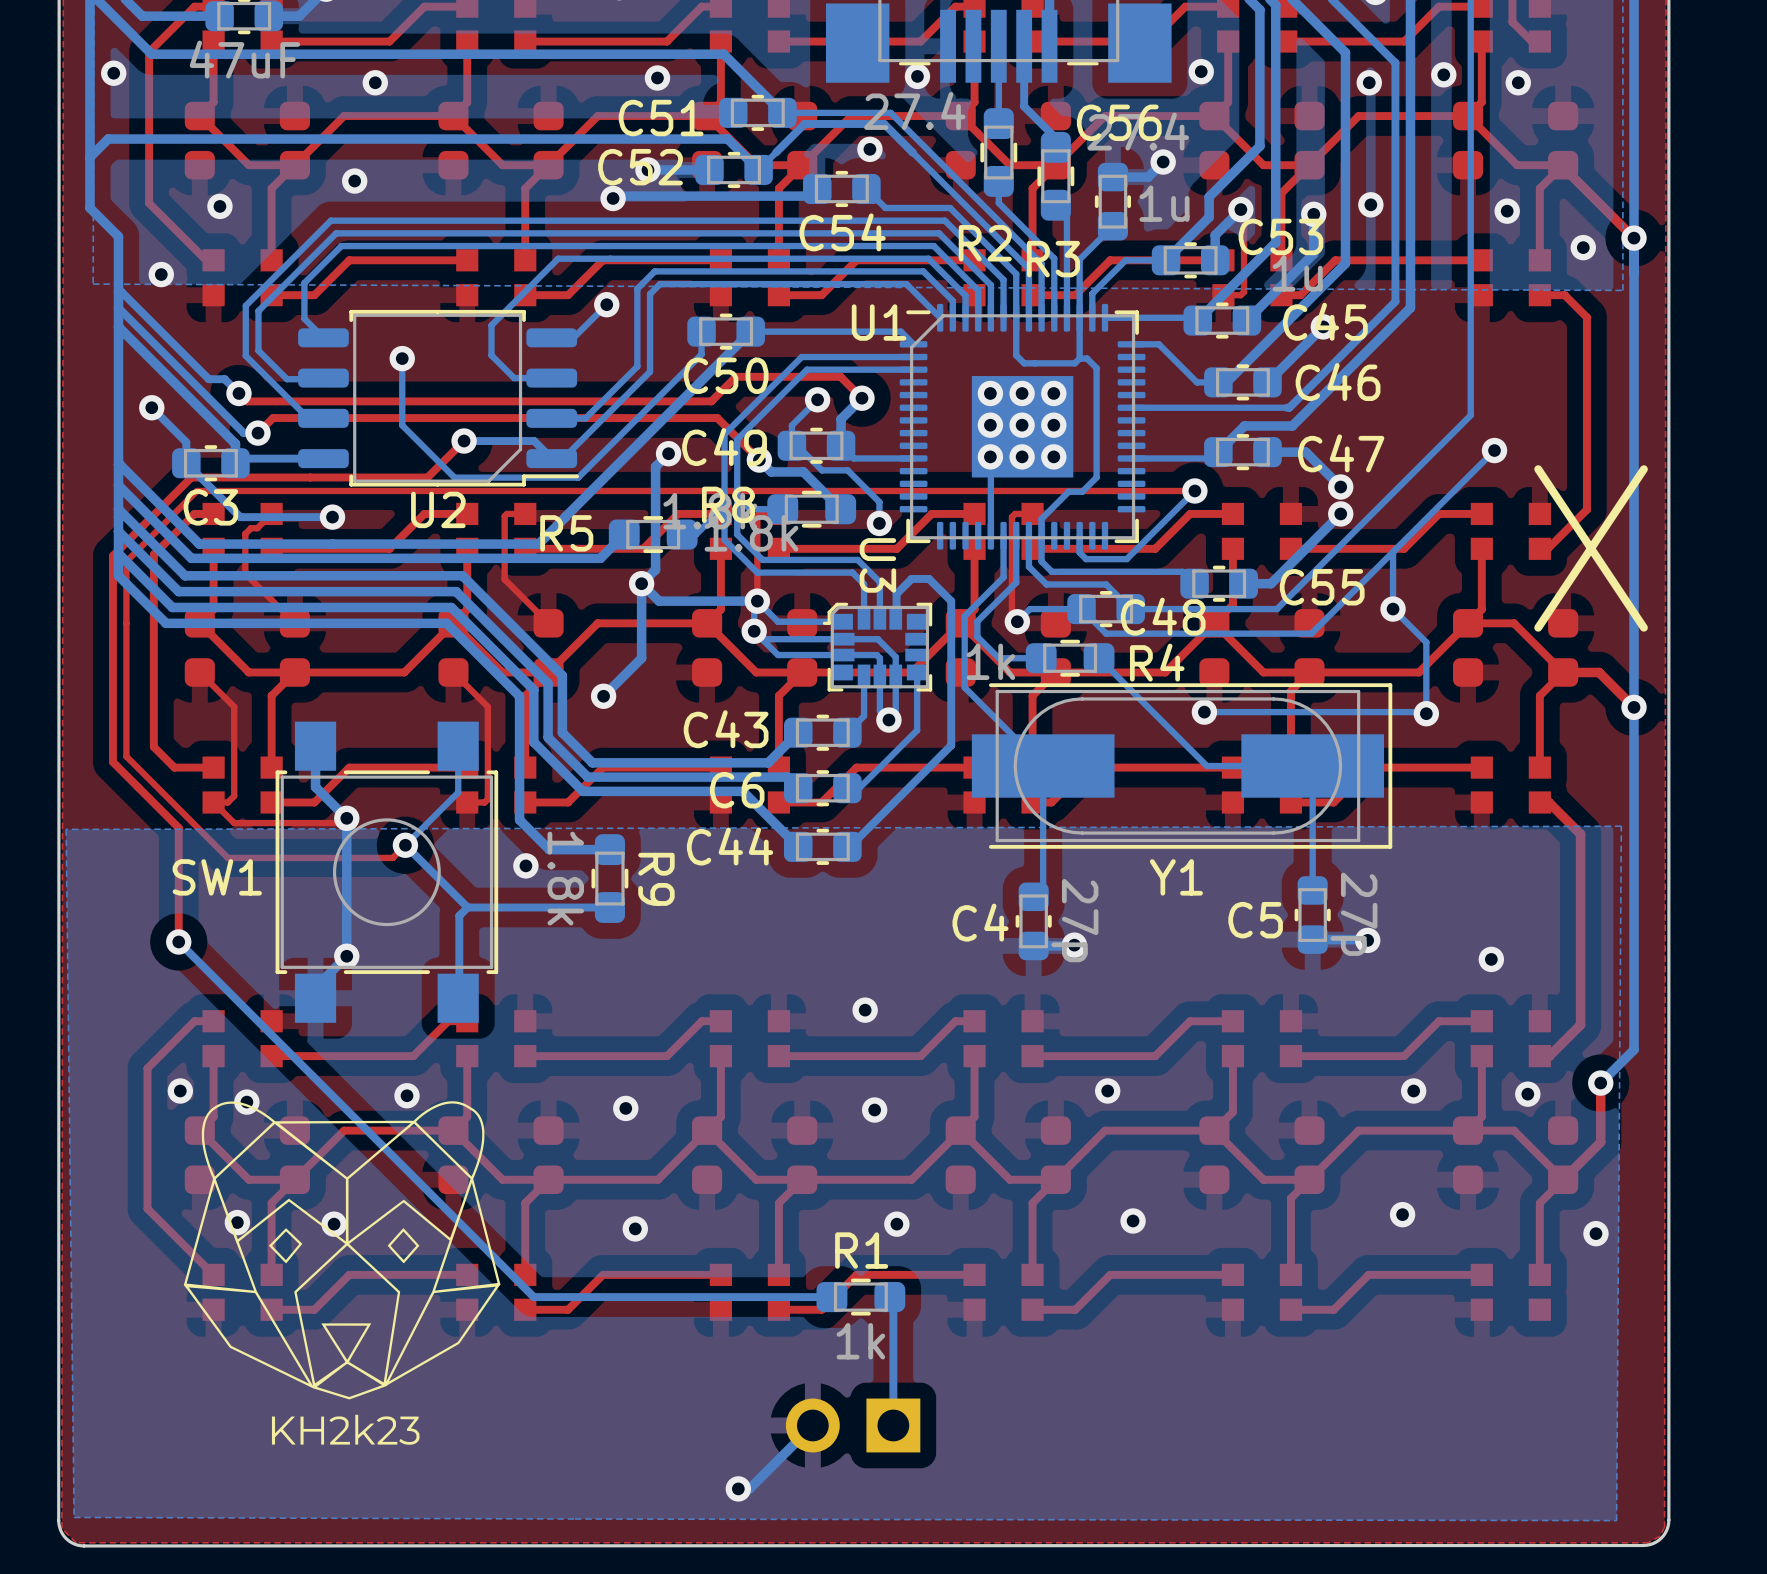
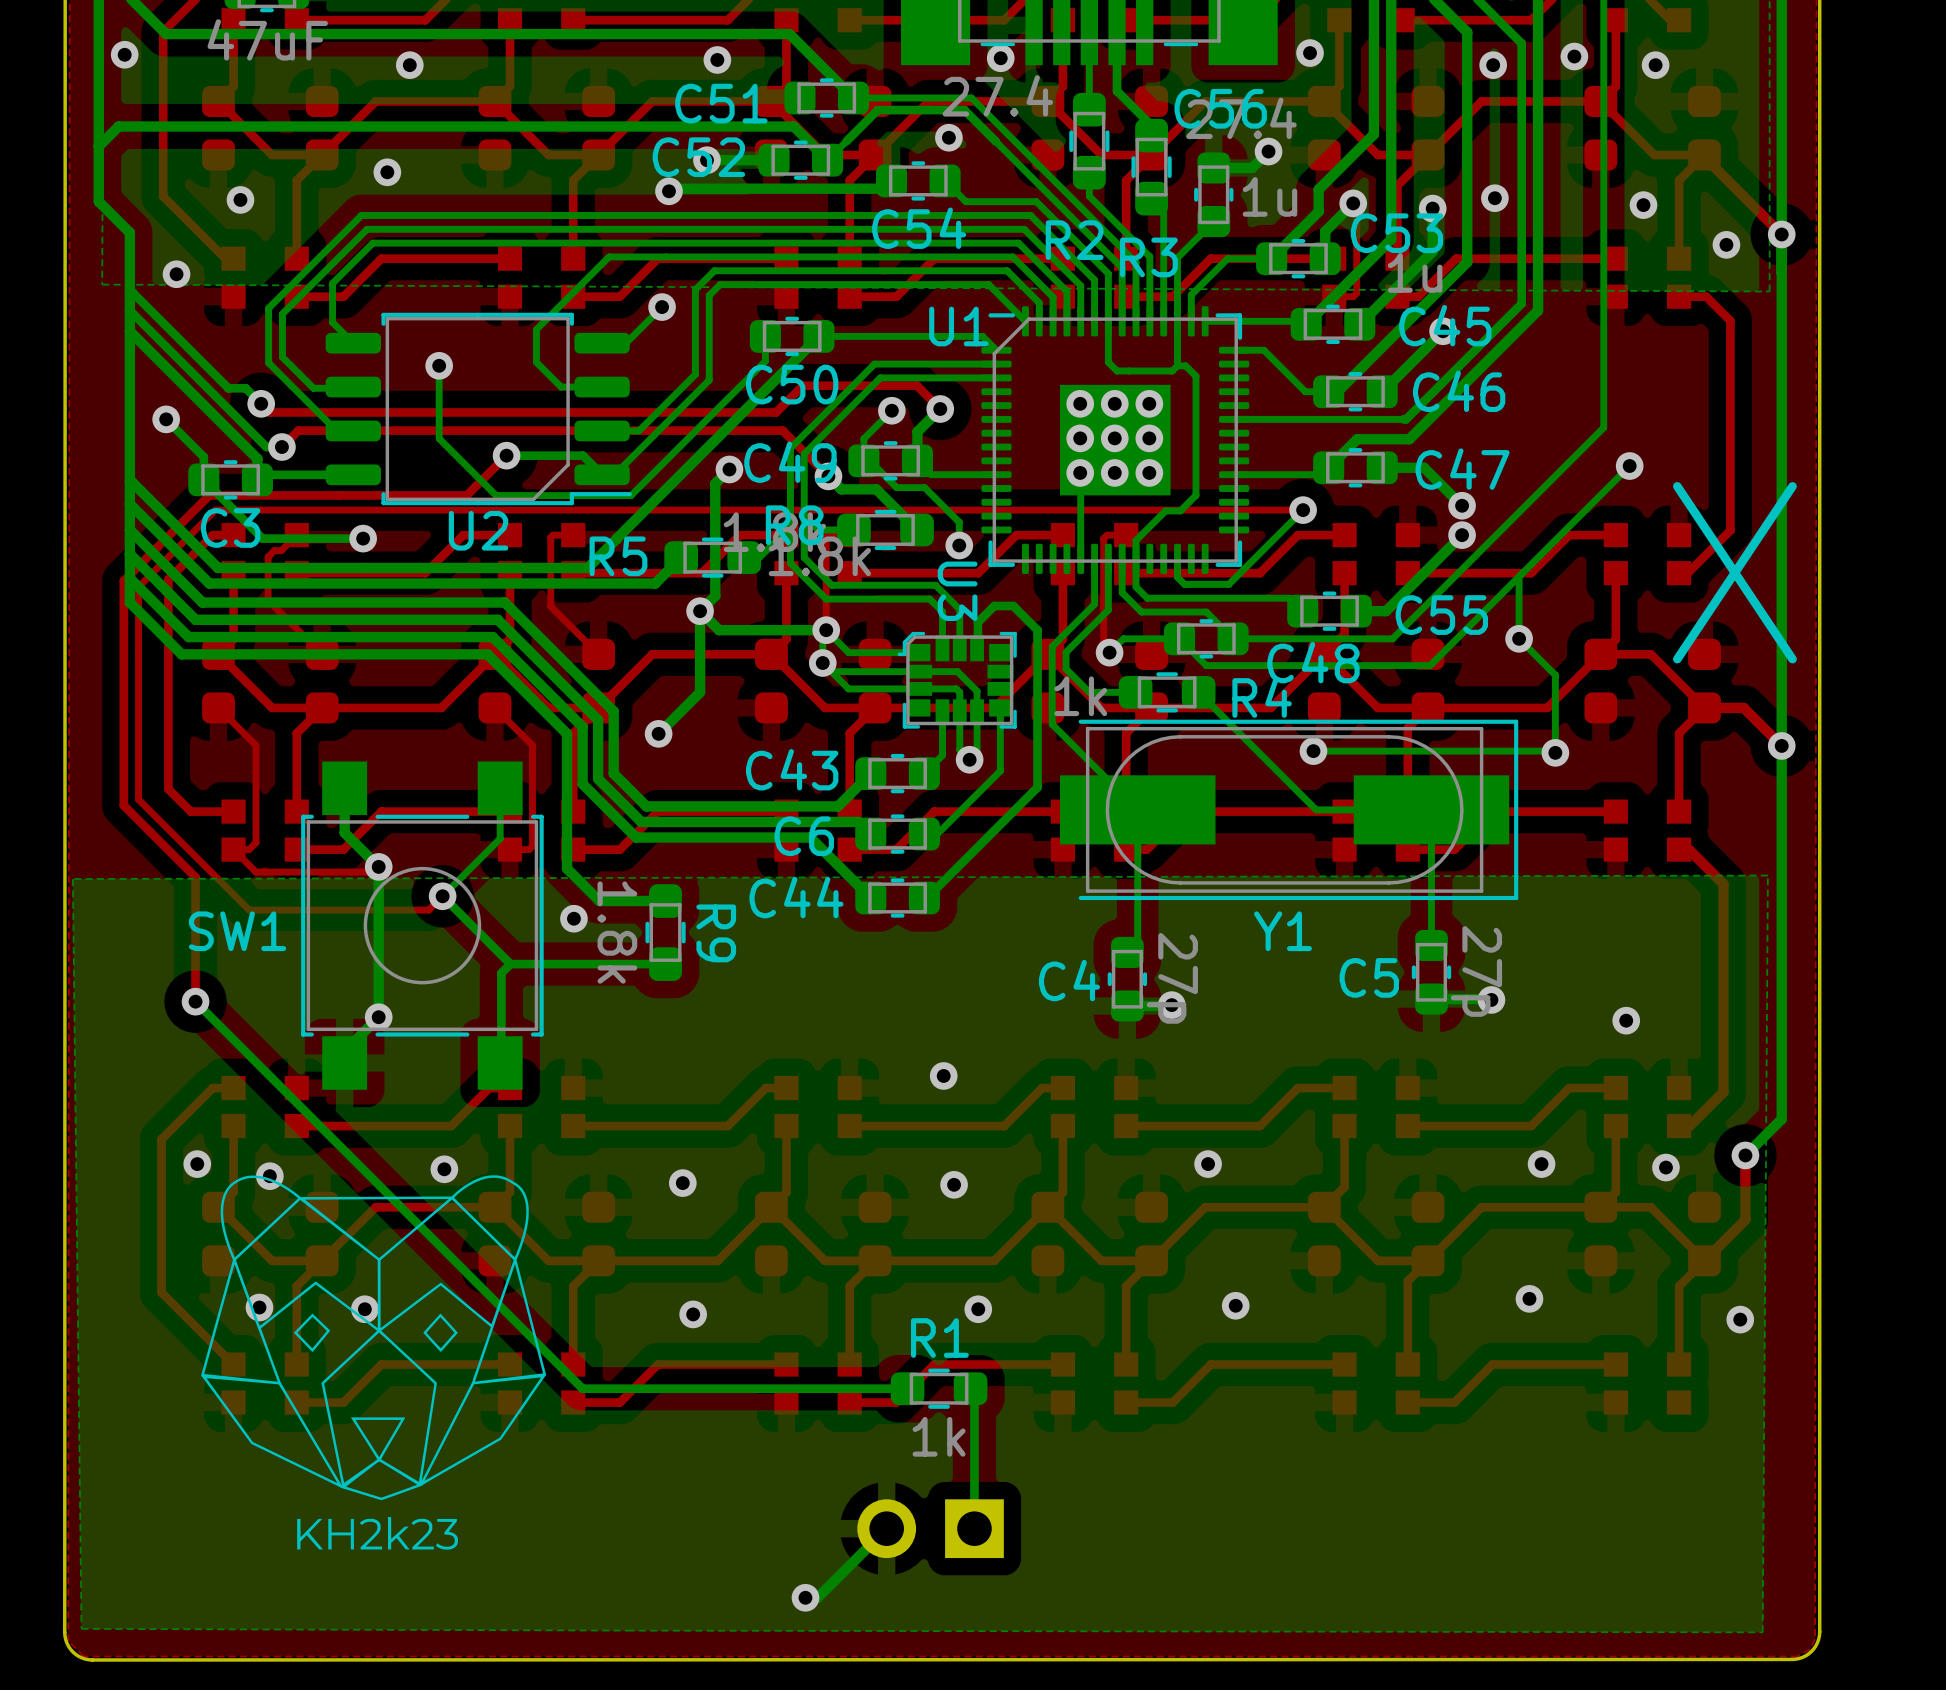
C48 name position: C48 (1163, 616) -> C48 (1313, 662)

